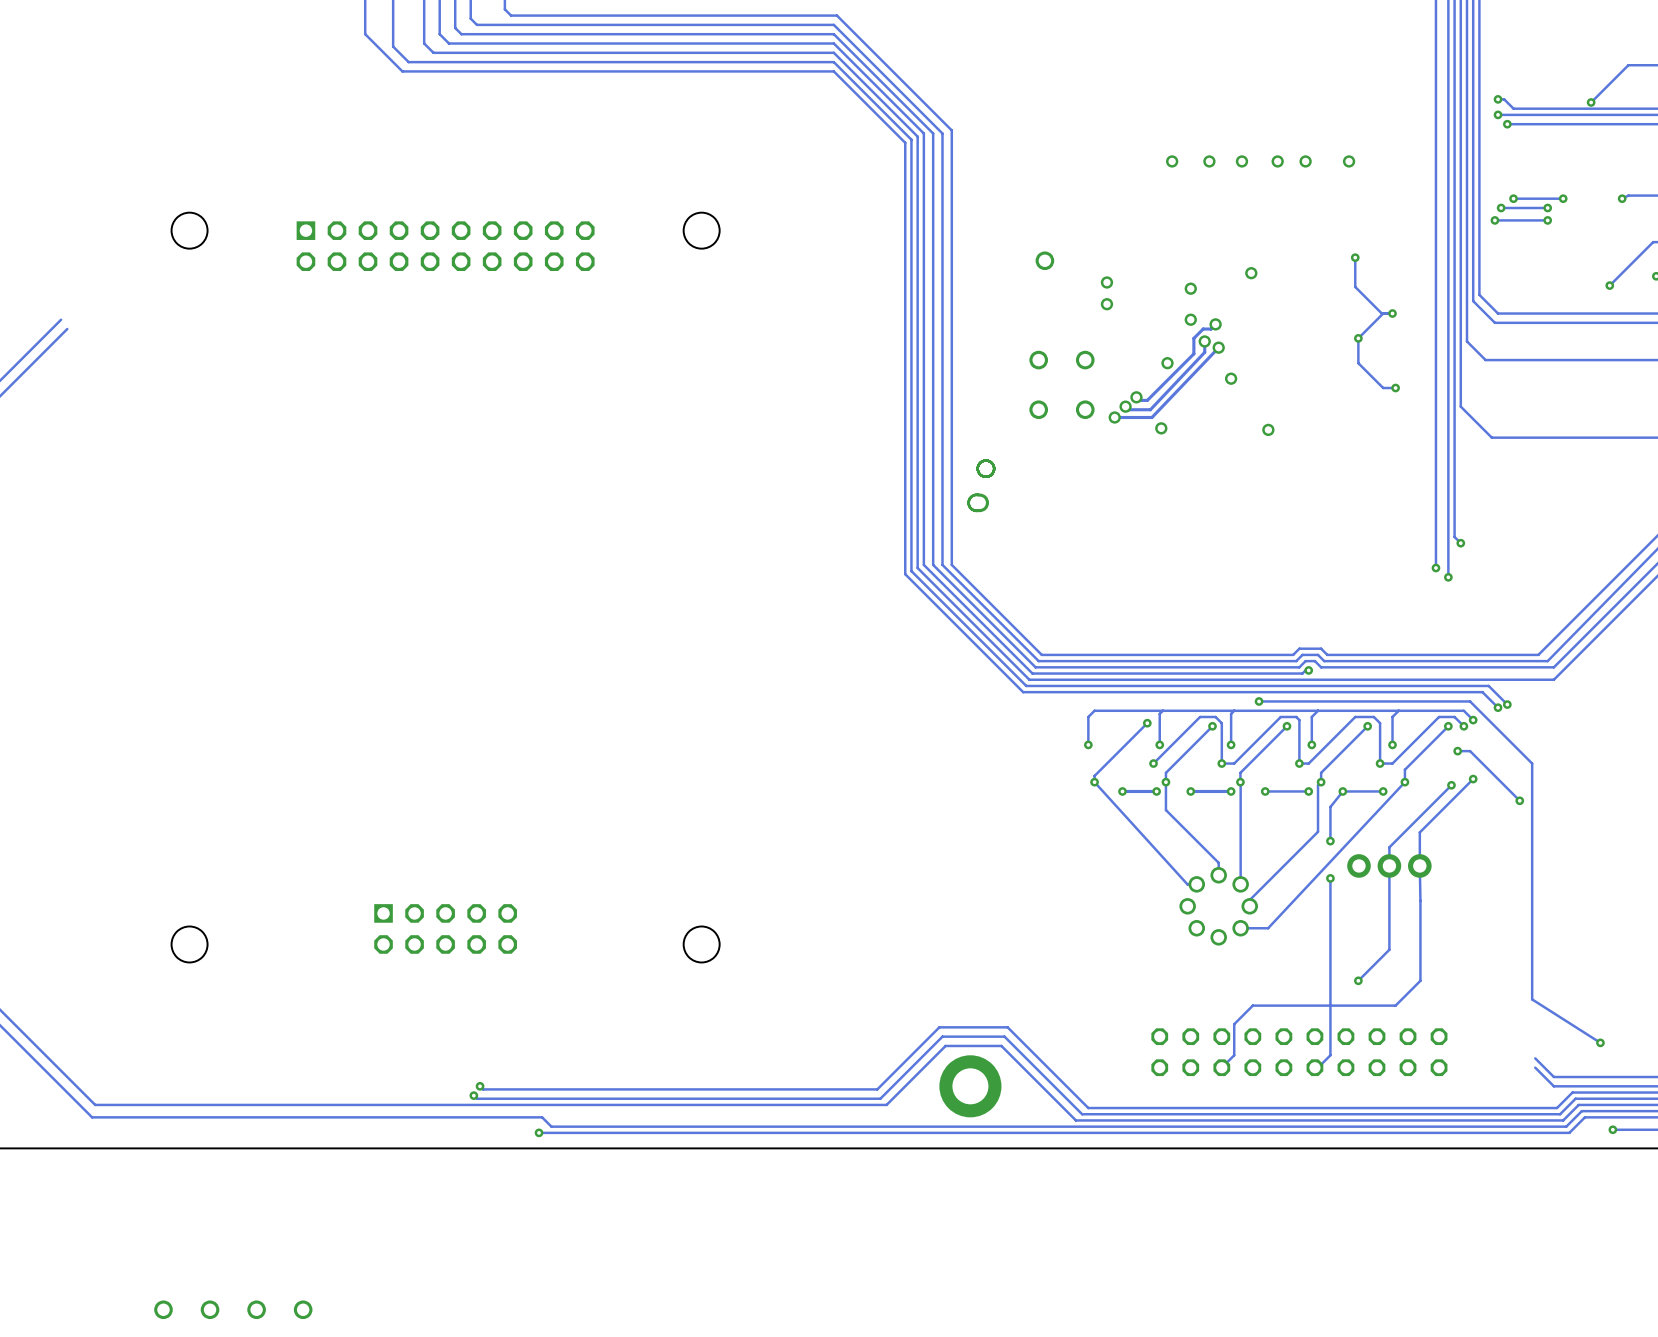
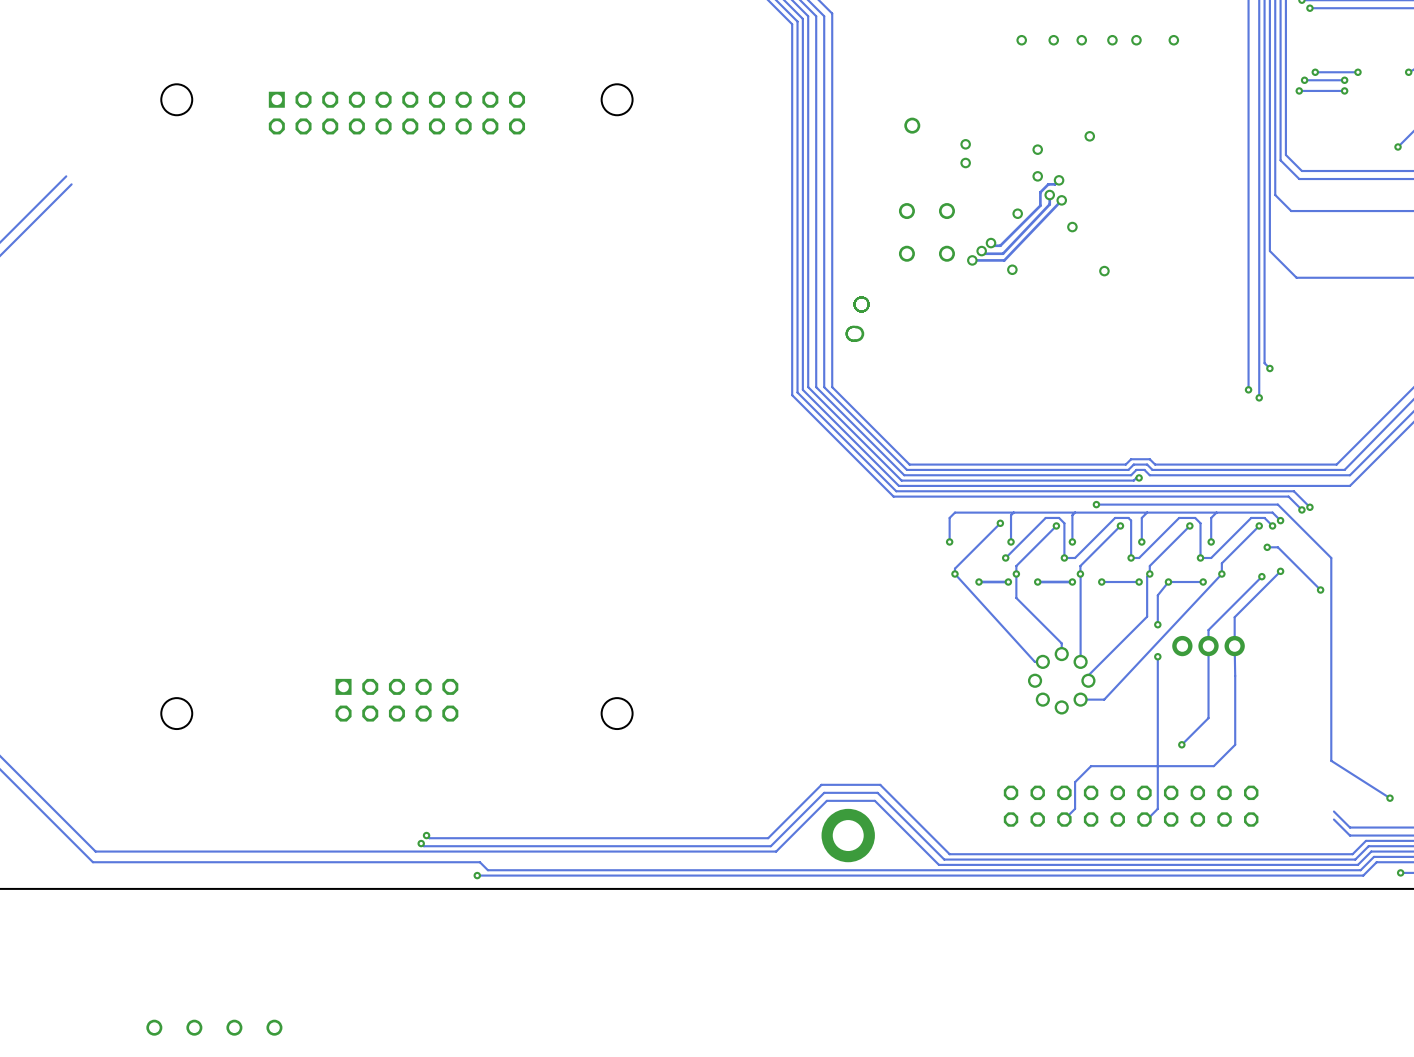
track: (1355, 257) (1355, 286) (1381, 313) (1392, 313) -> none
via: (1355, 257) -> none
track: (1383, 313) (1358, 338) (1358, 363) (1383, 388) (1395, 388) -> none
via: (1392, 313) -> none
via: (1358, 338) -> none
via: (1395, 388) -> none

